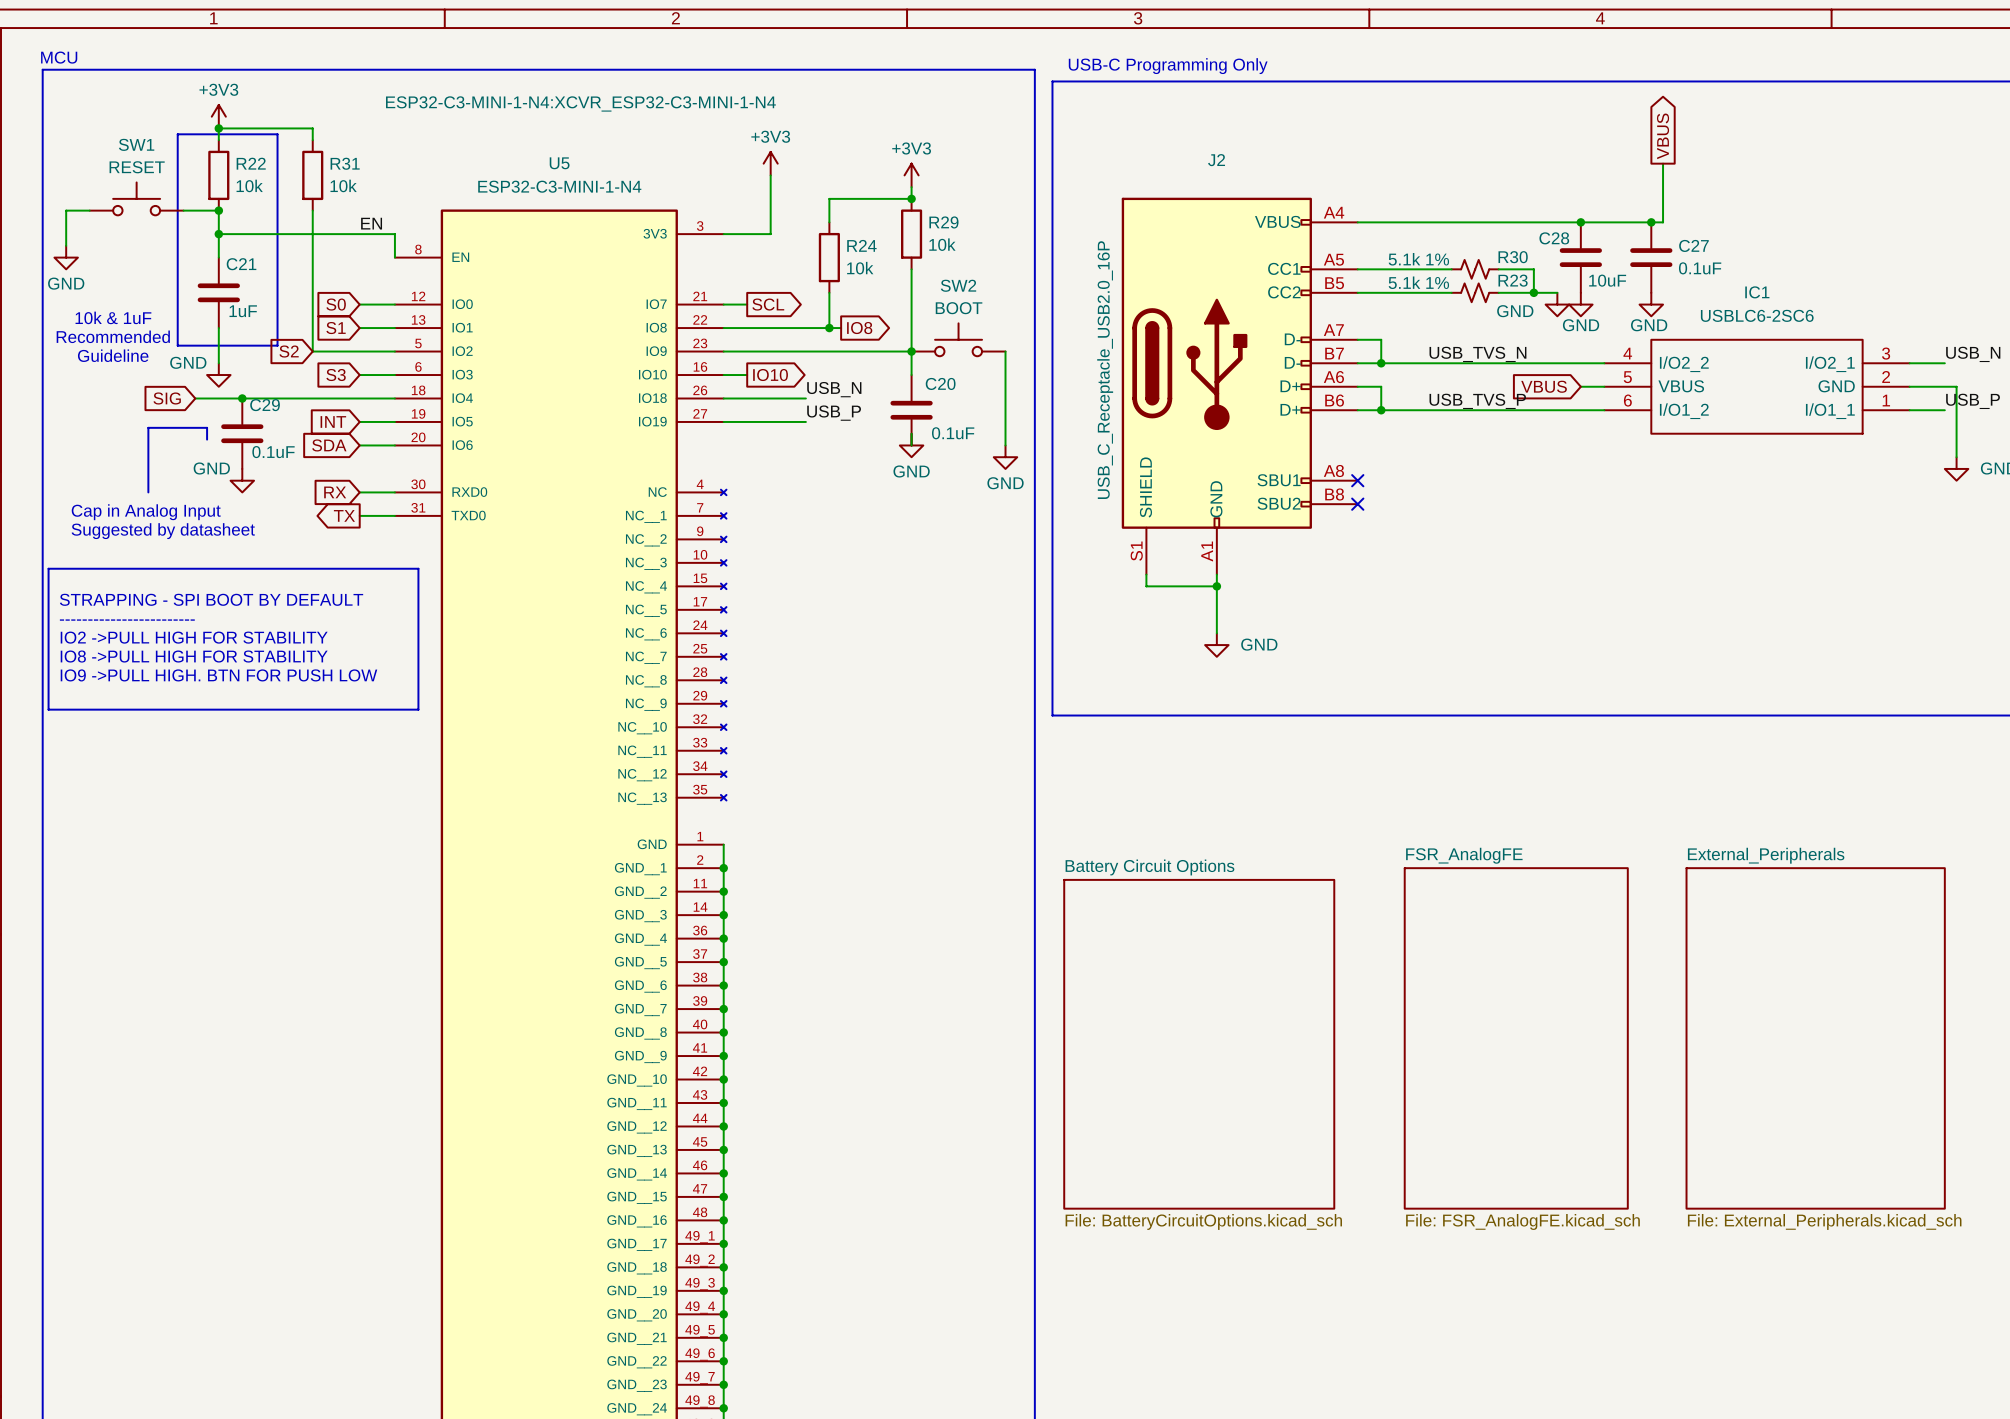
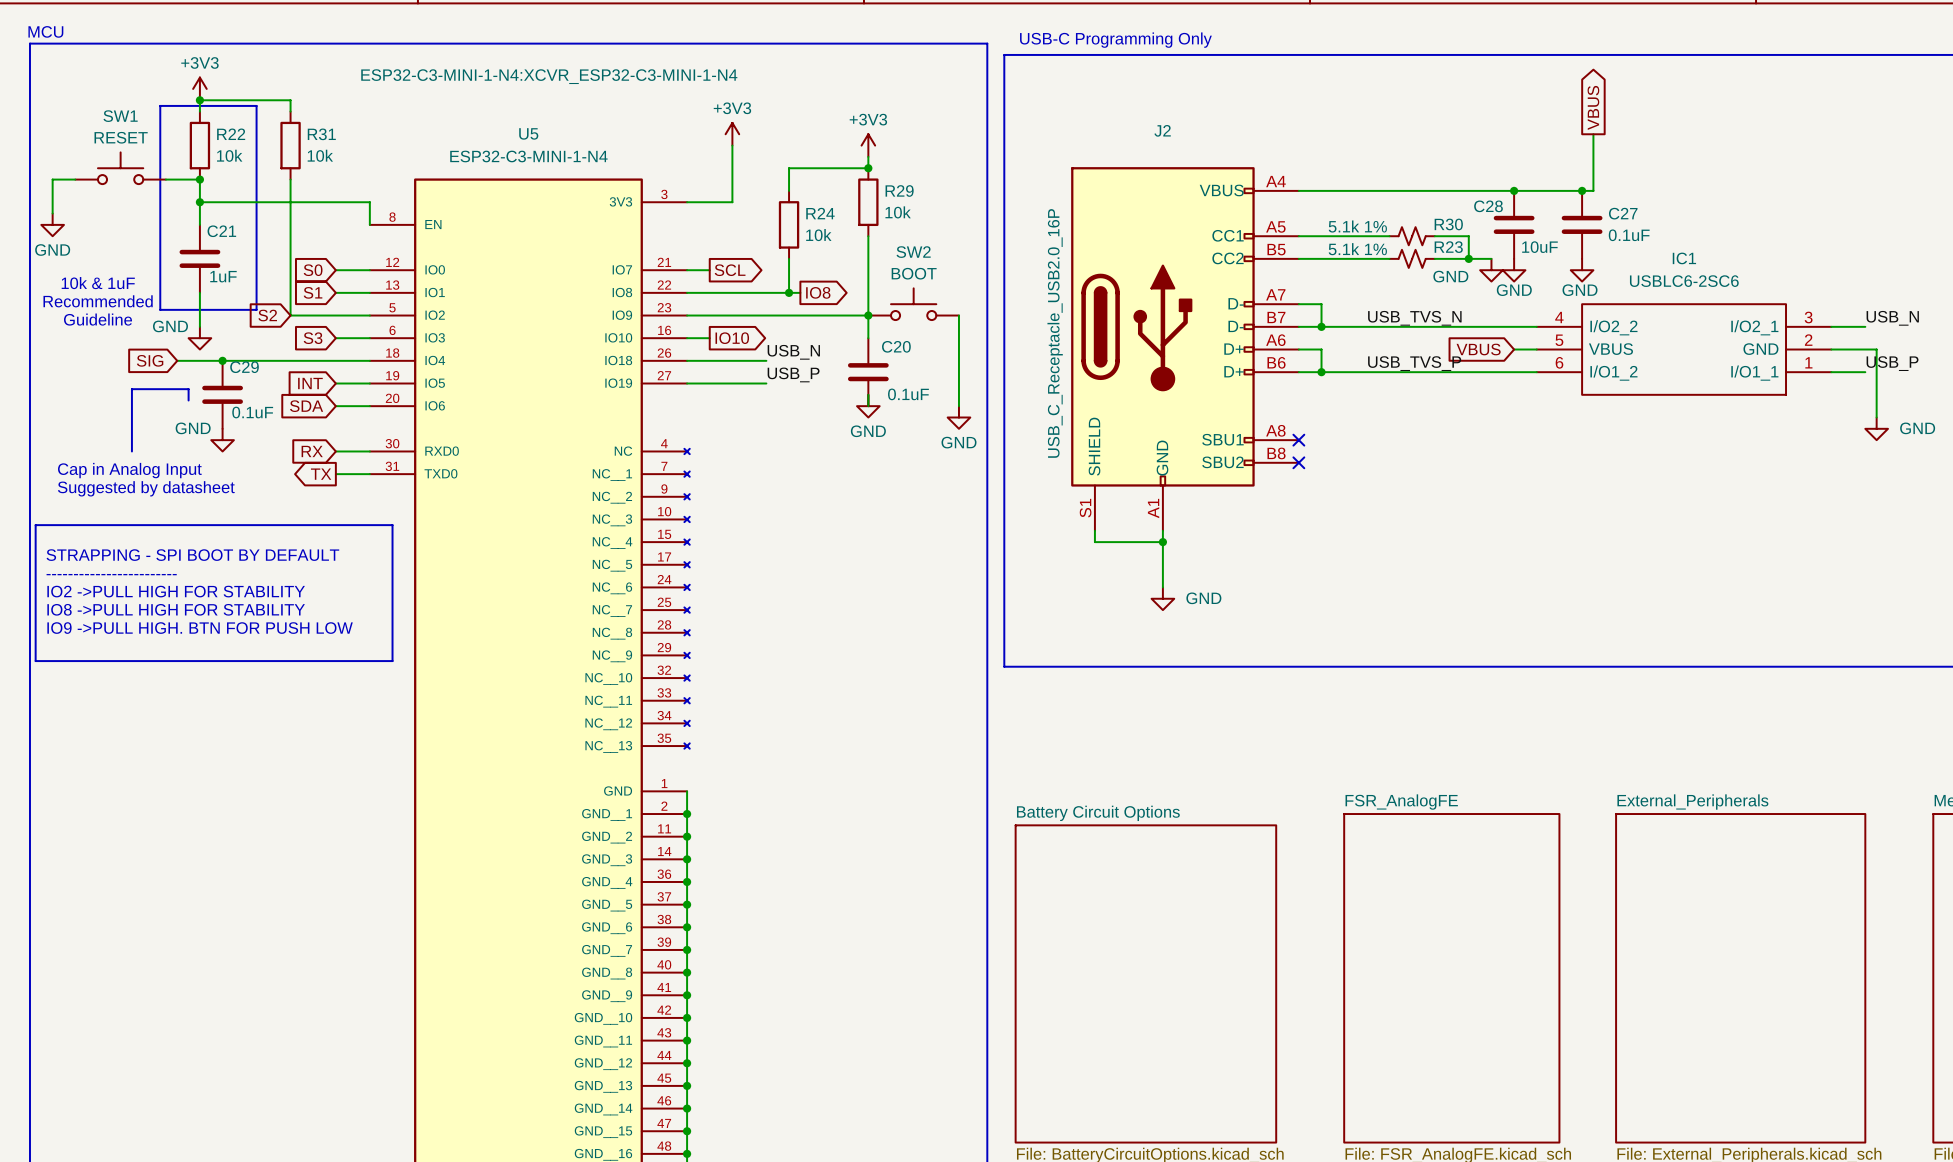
label: EN (371, 223) -> none

